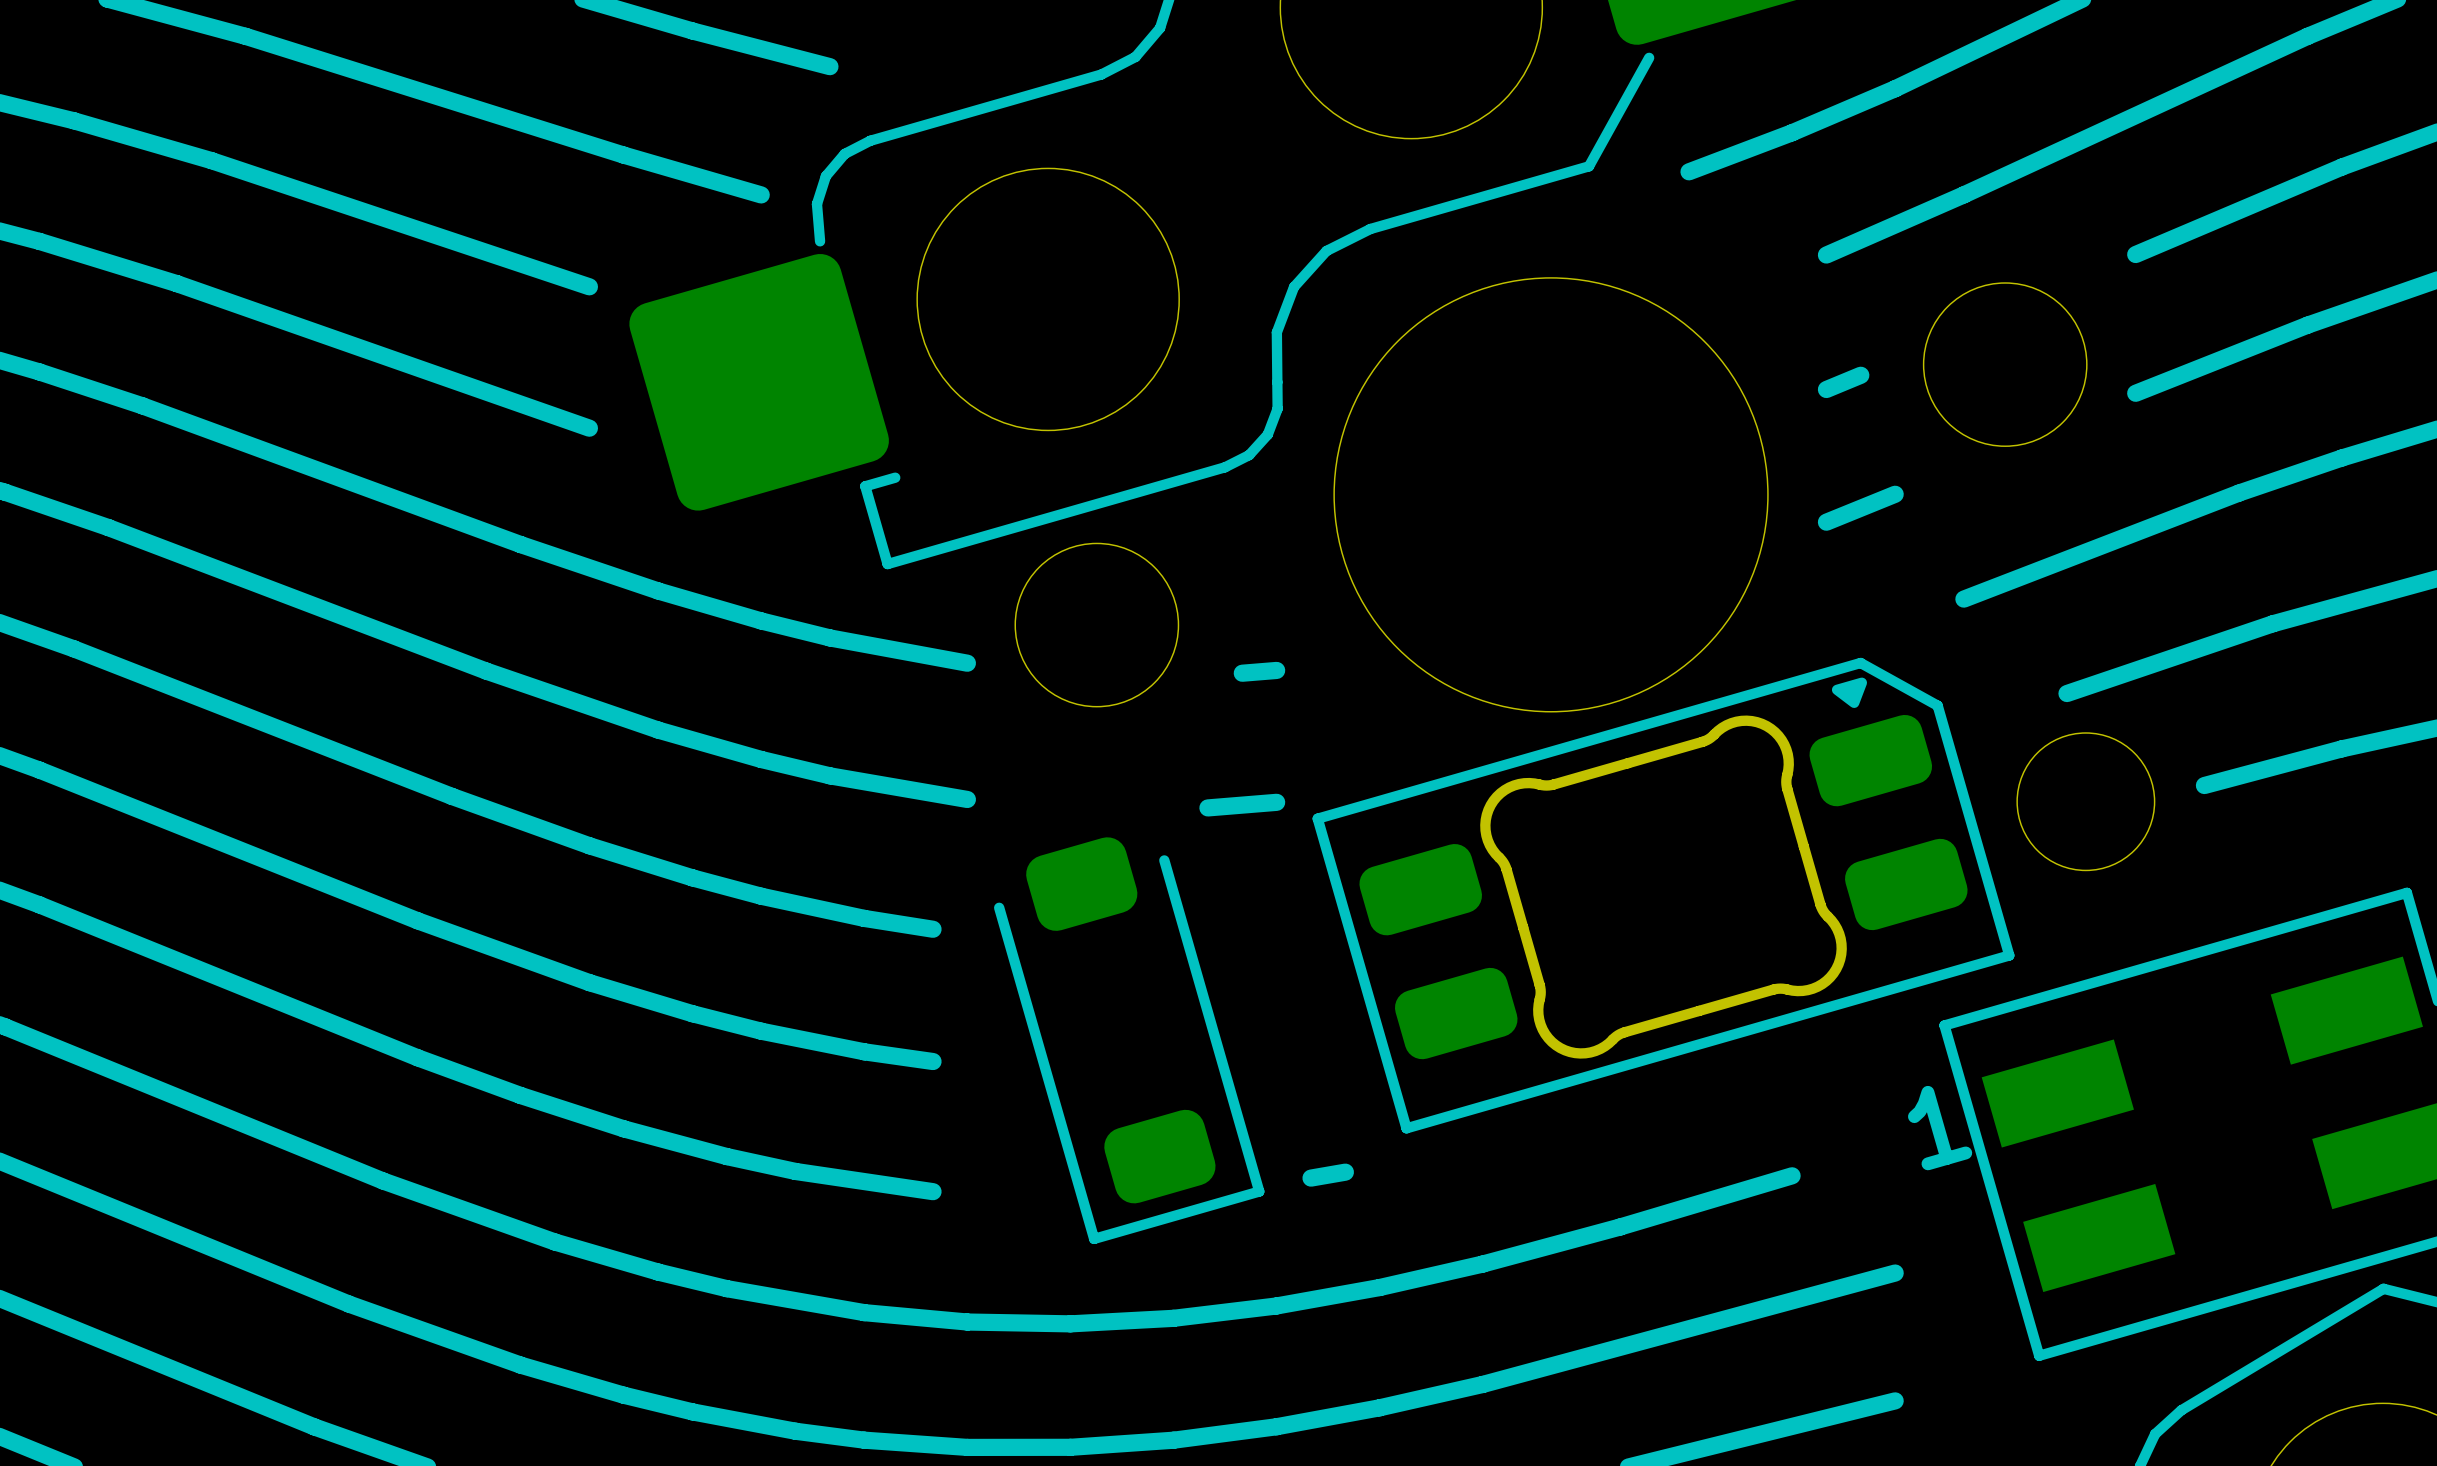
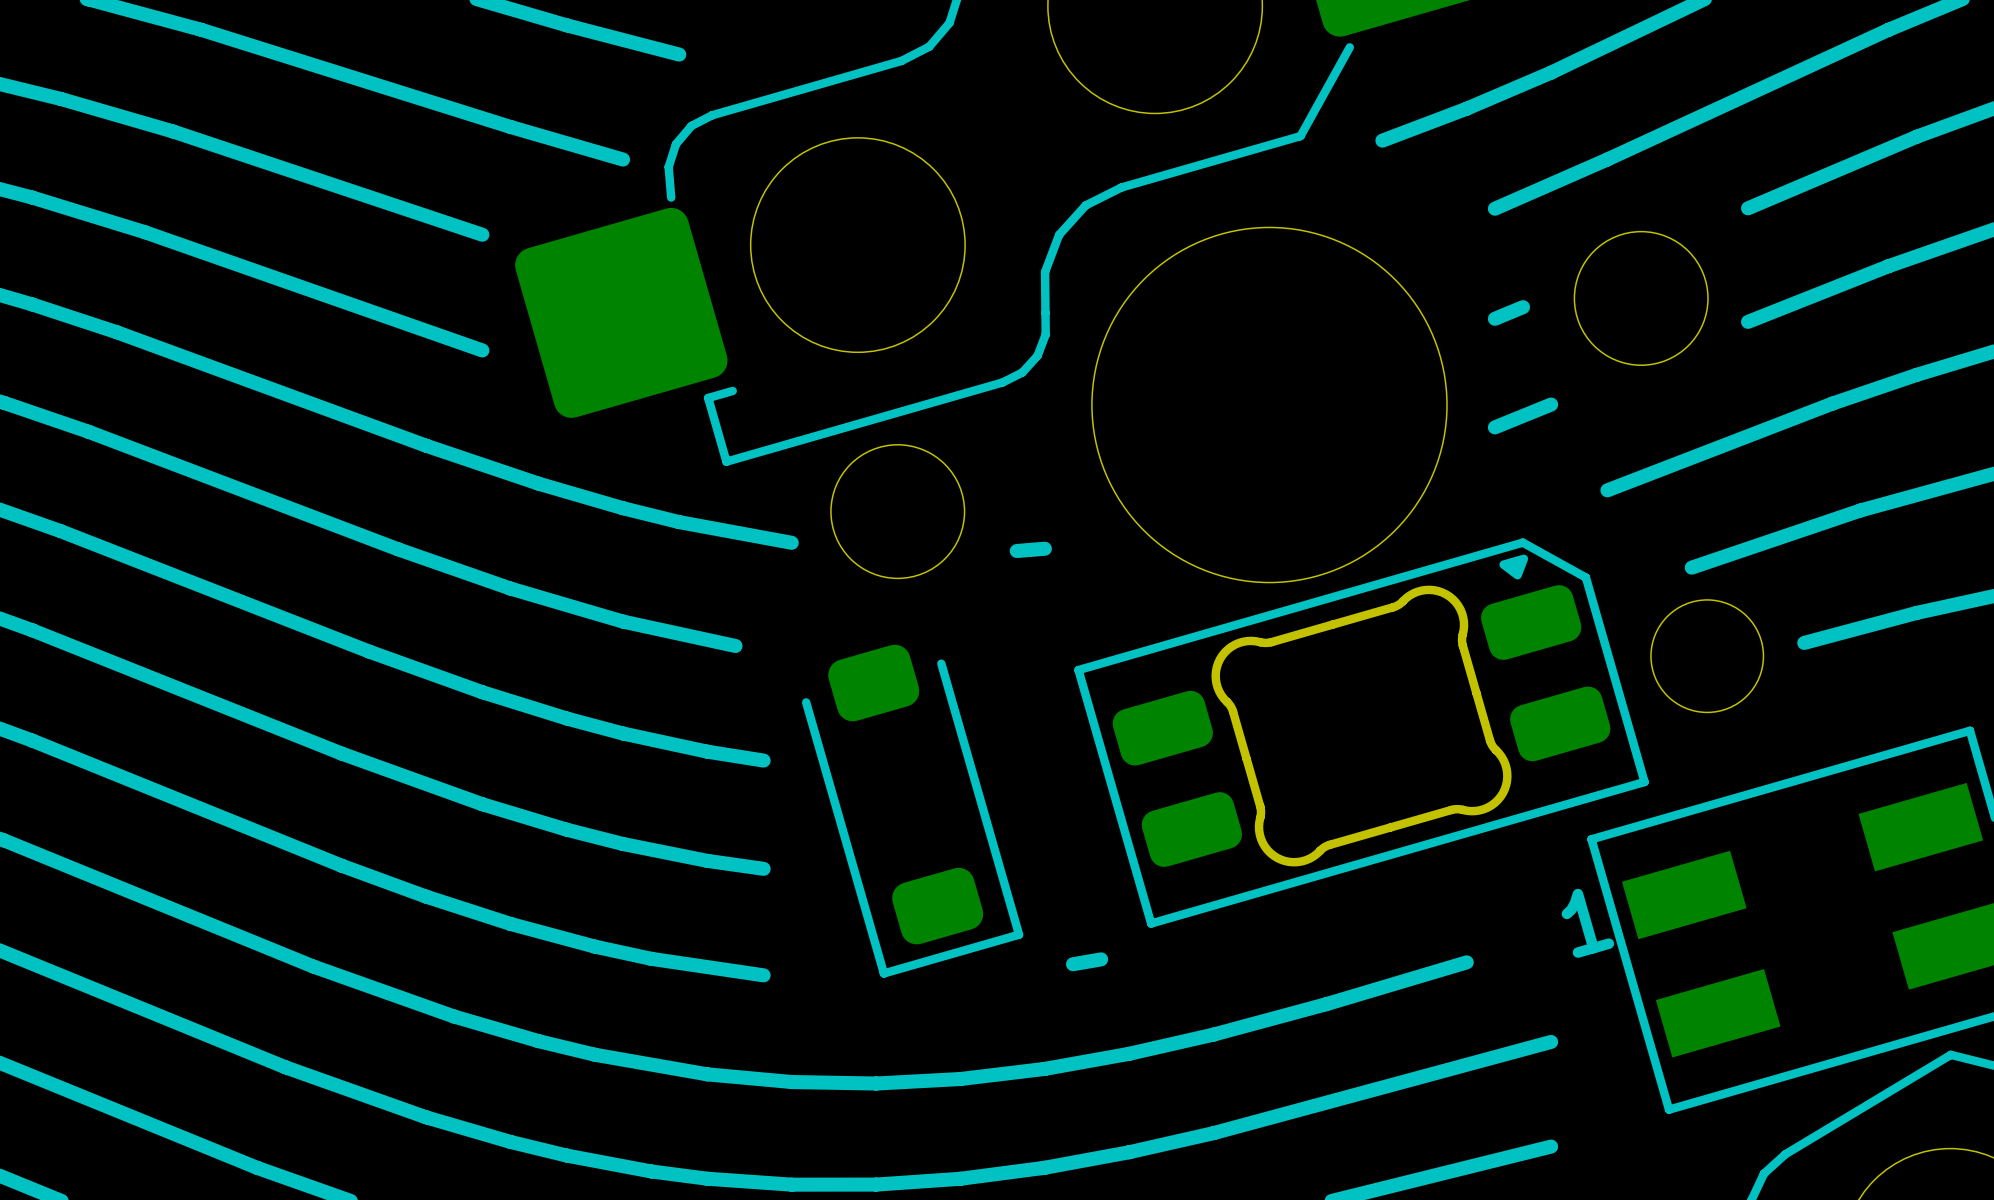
line: (486, 671) (658, 730) (761, 759) (829, 775) (967, 799) -> (398, 549) (510, 588) (623, 621) (735, 645)
line: (1276, 802) (1207, 807) -> none
part position: (1129, 1040) -> (912, 811)

